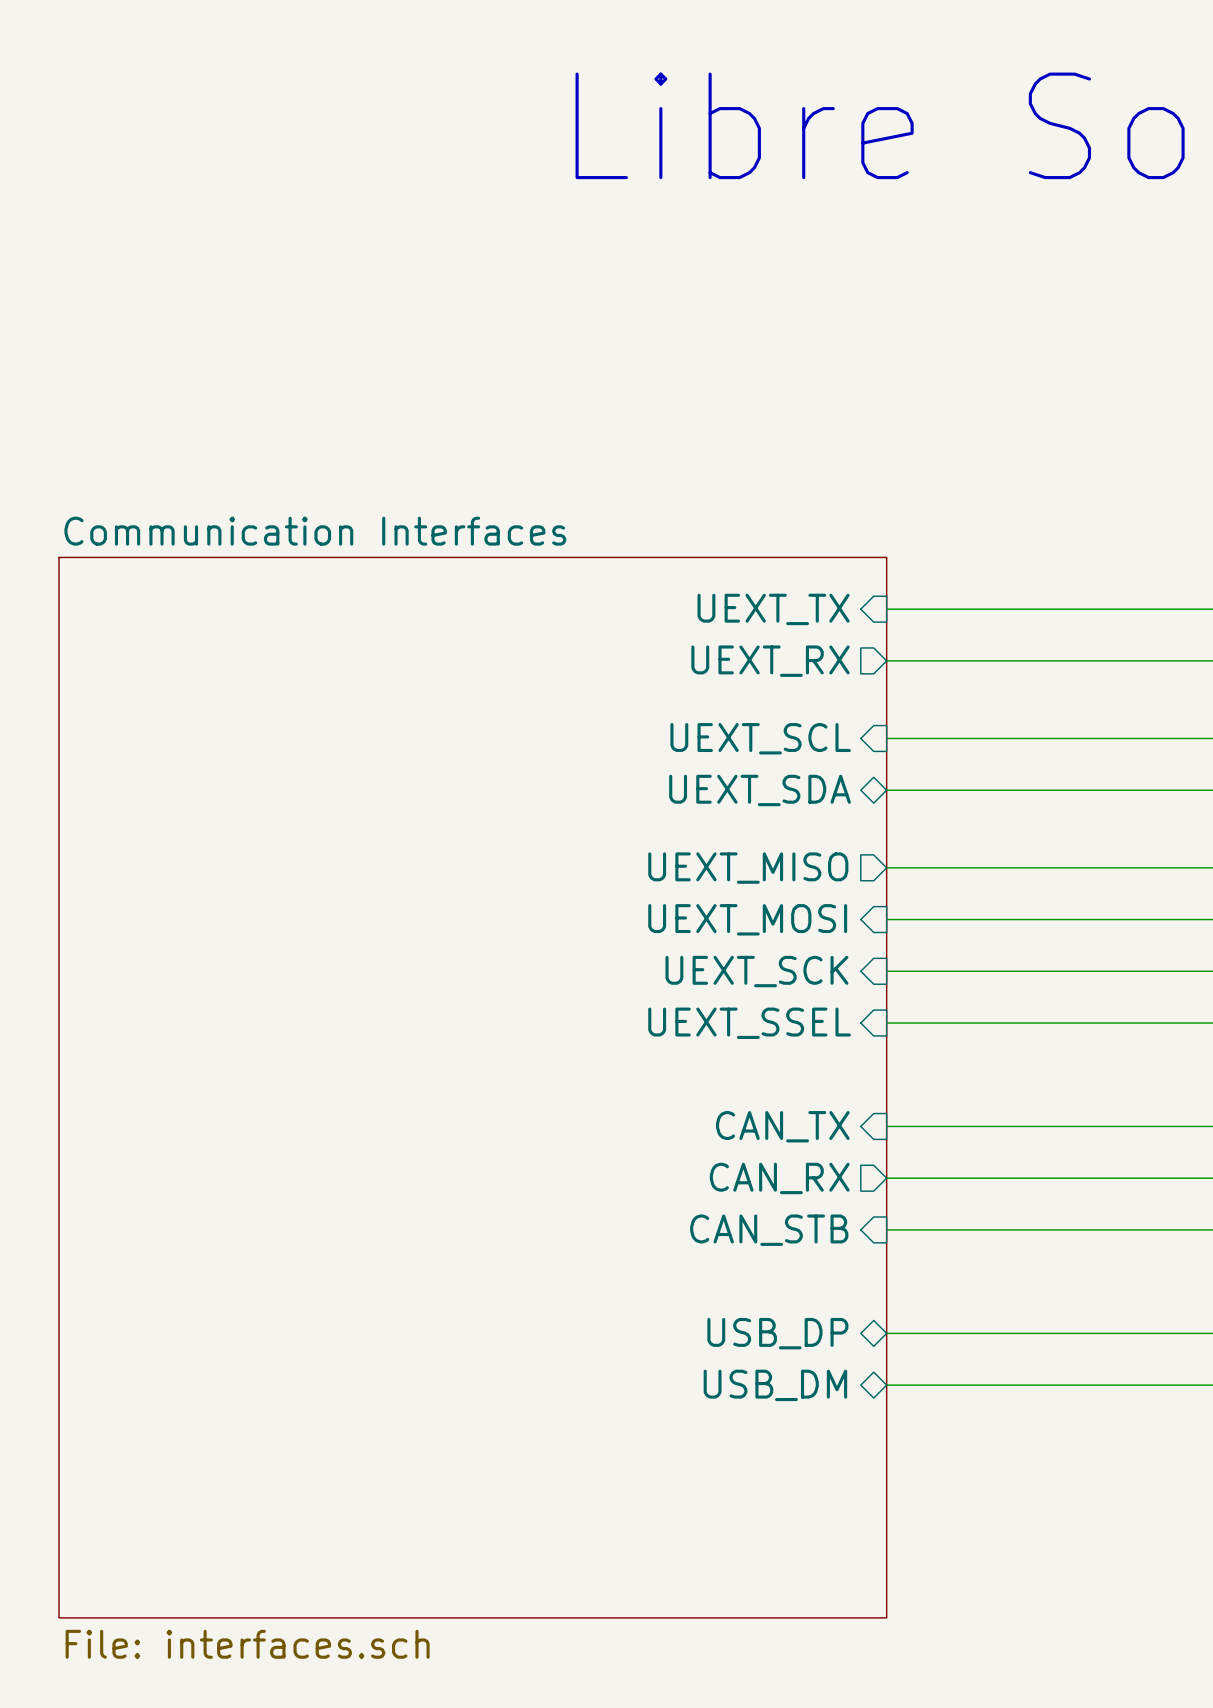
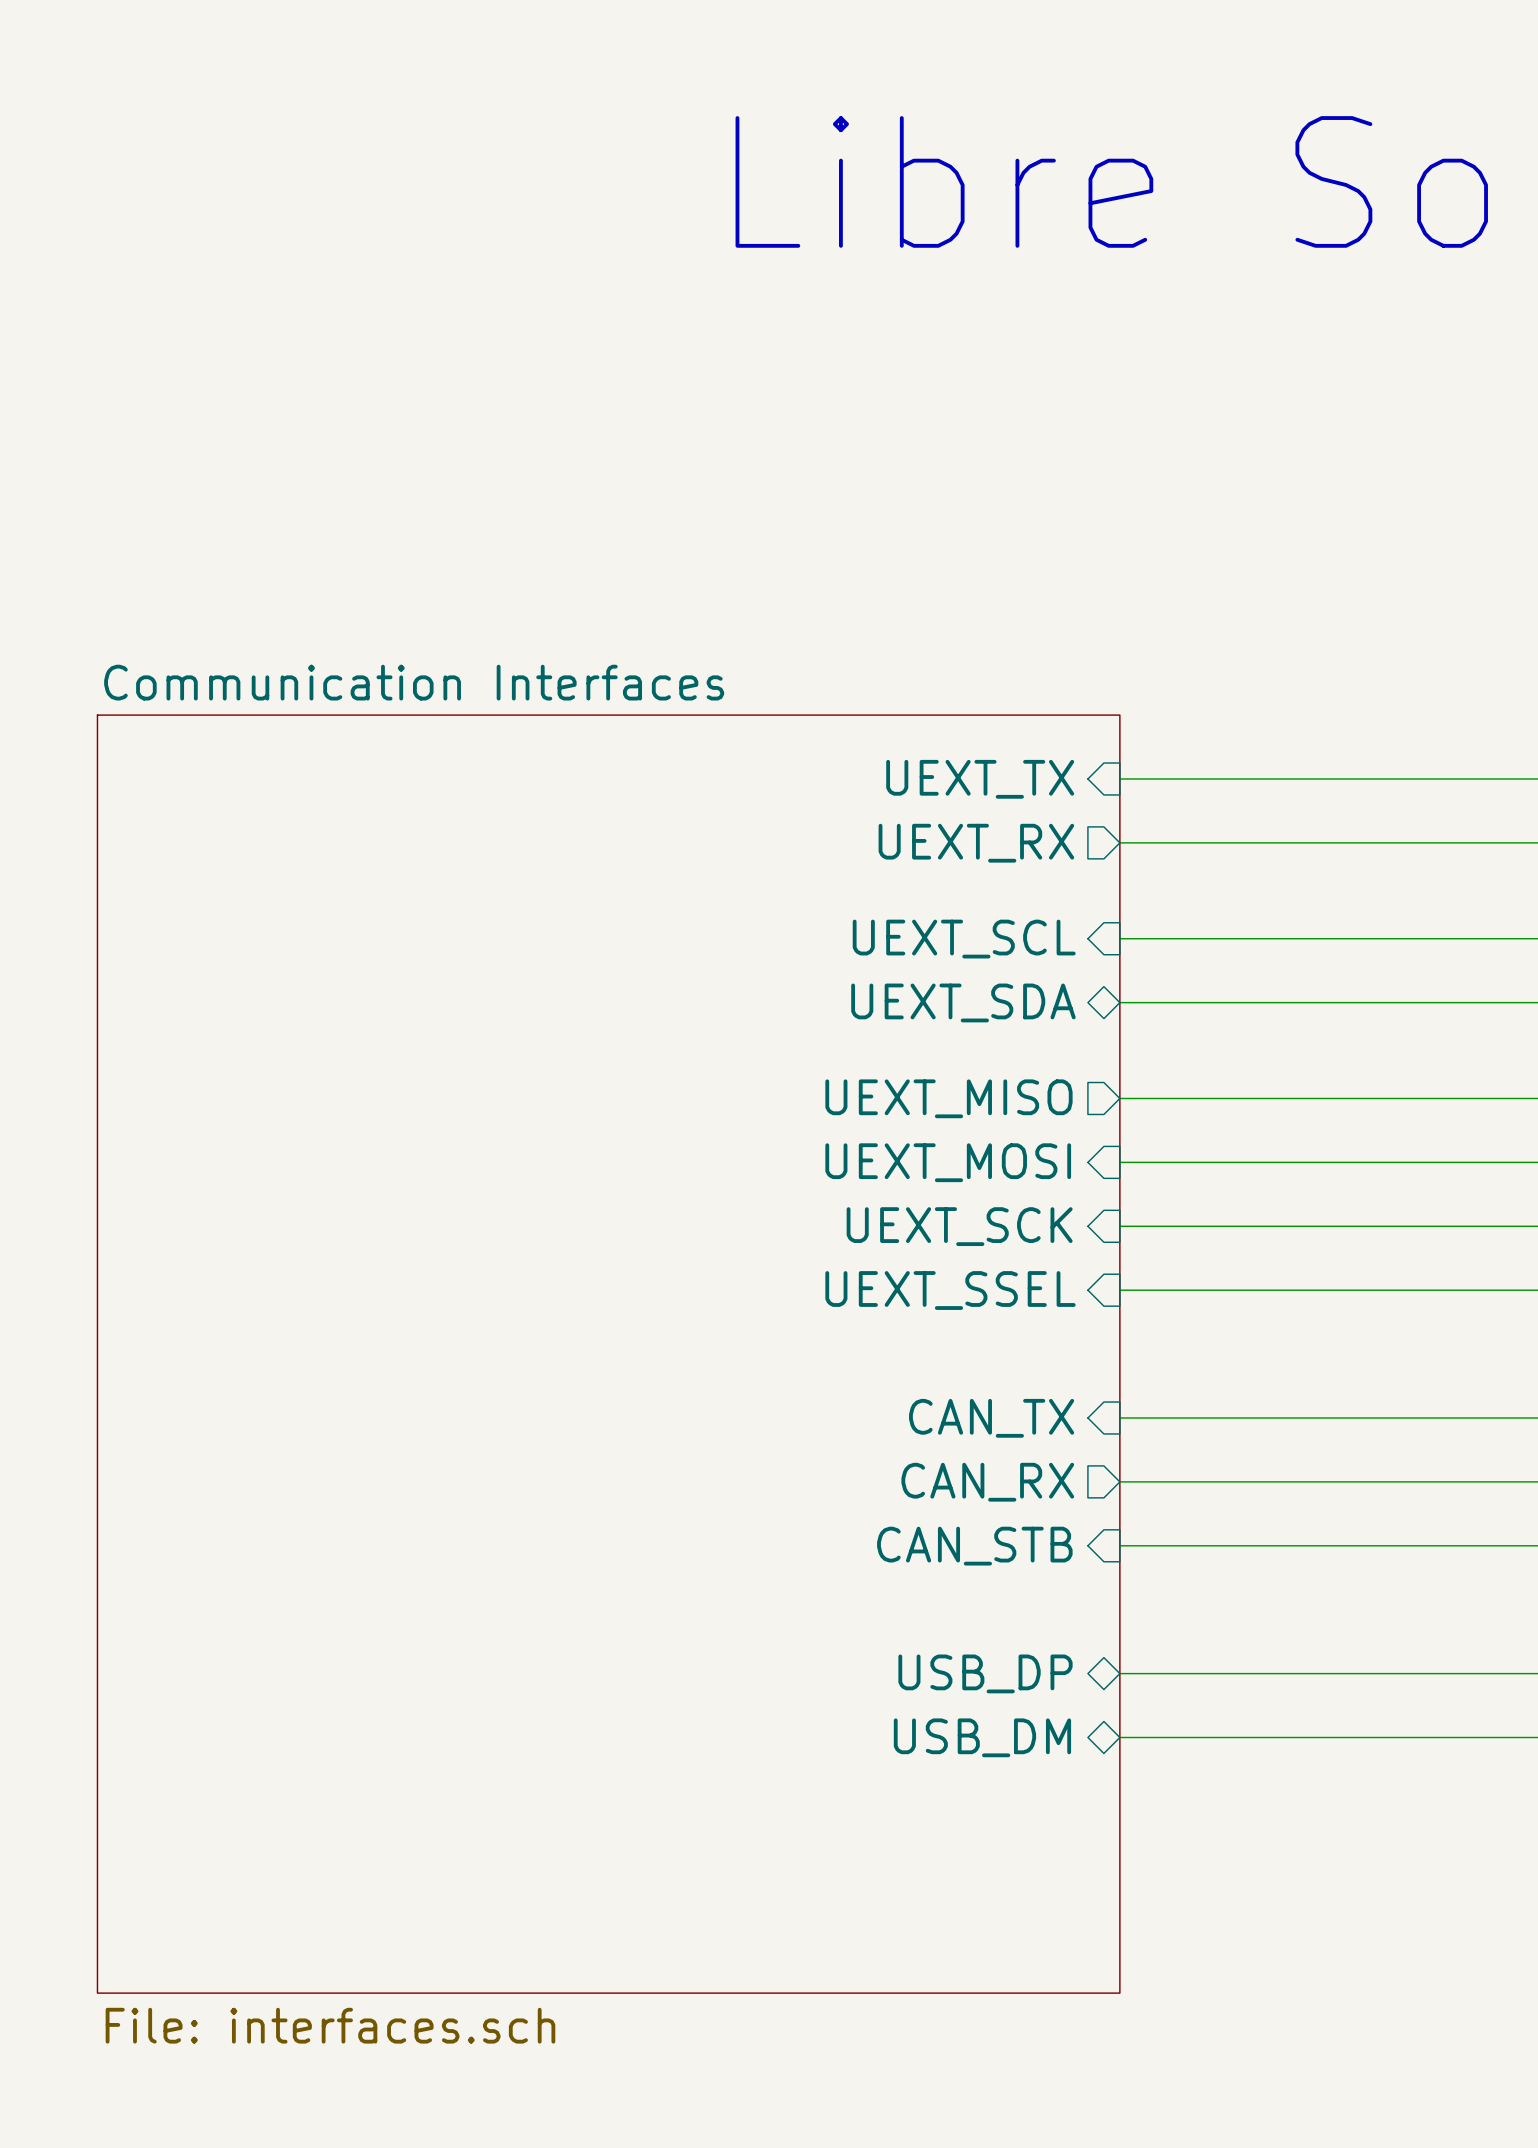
sheet Communication Interfaces shape: [58, 557, 887, 1618] -> [97, 715, 1120, 1994]

